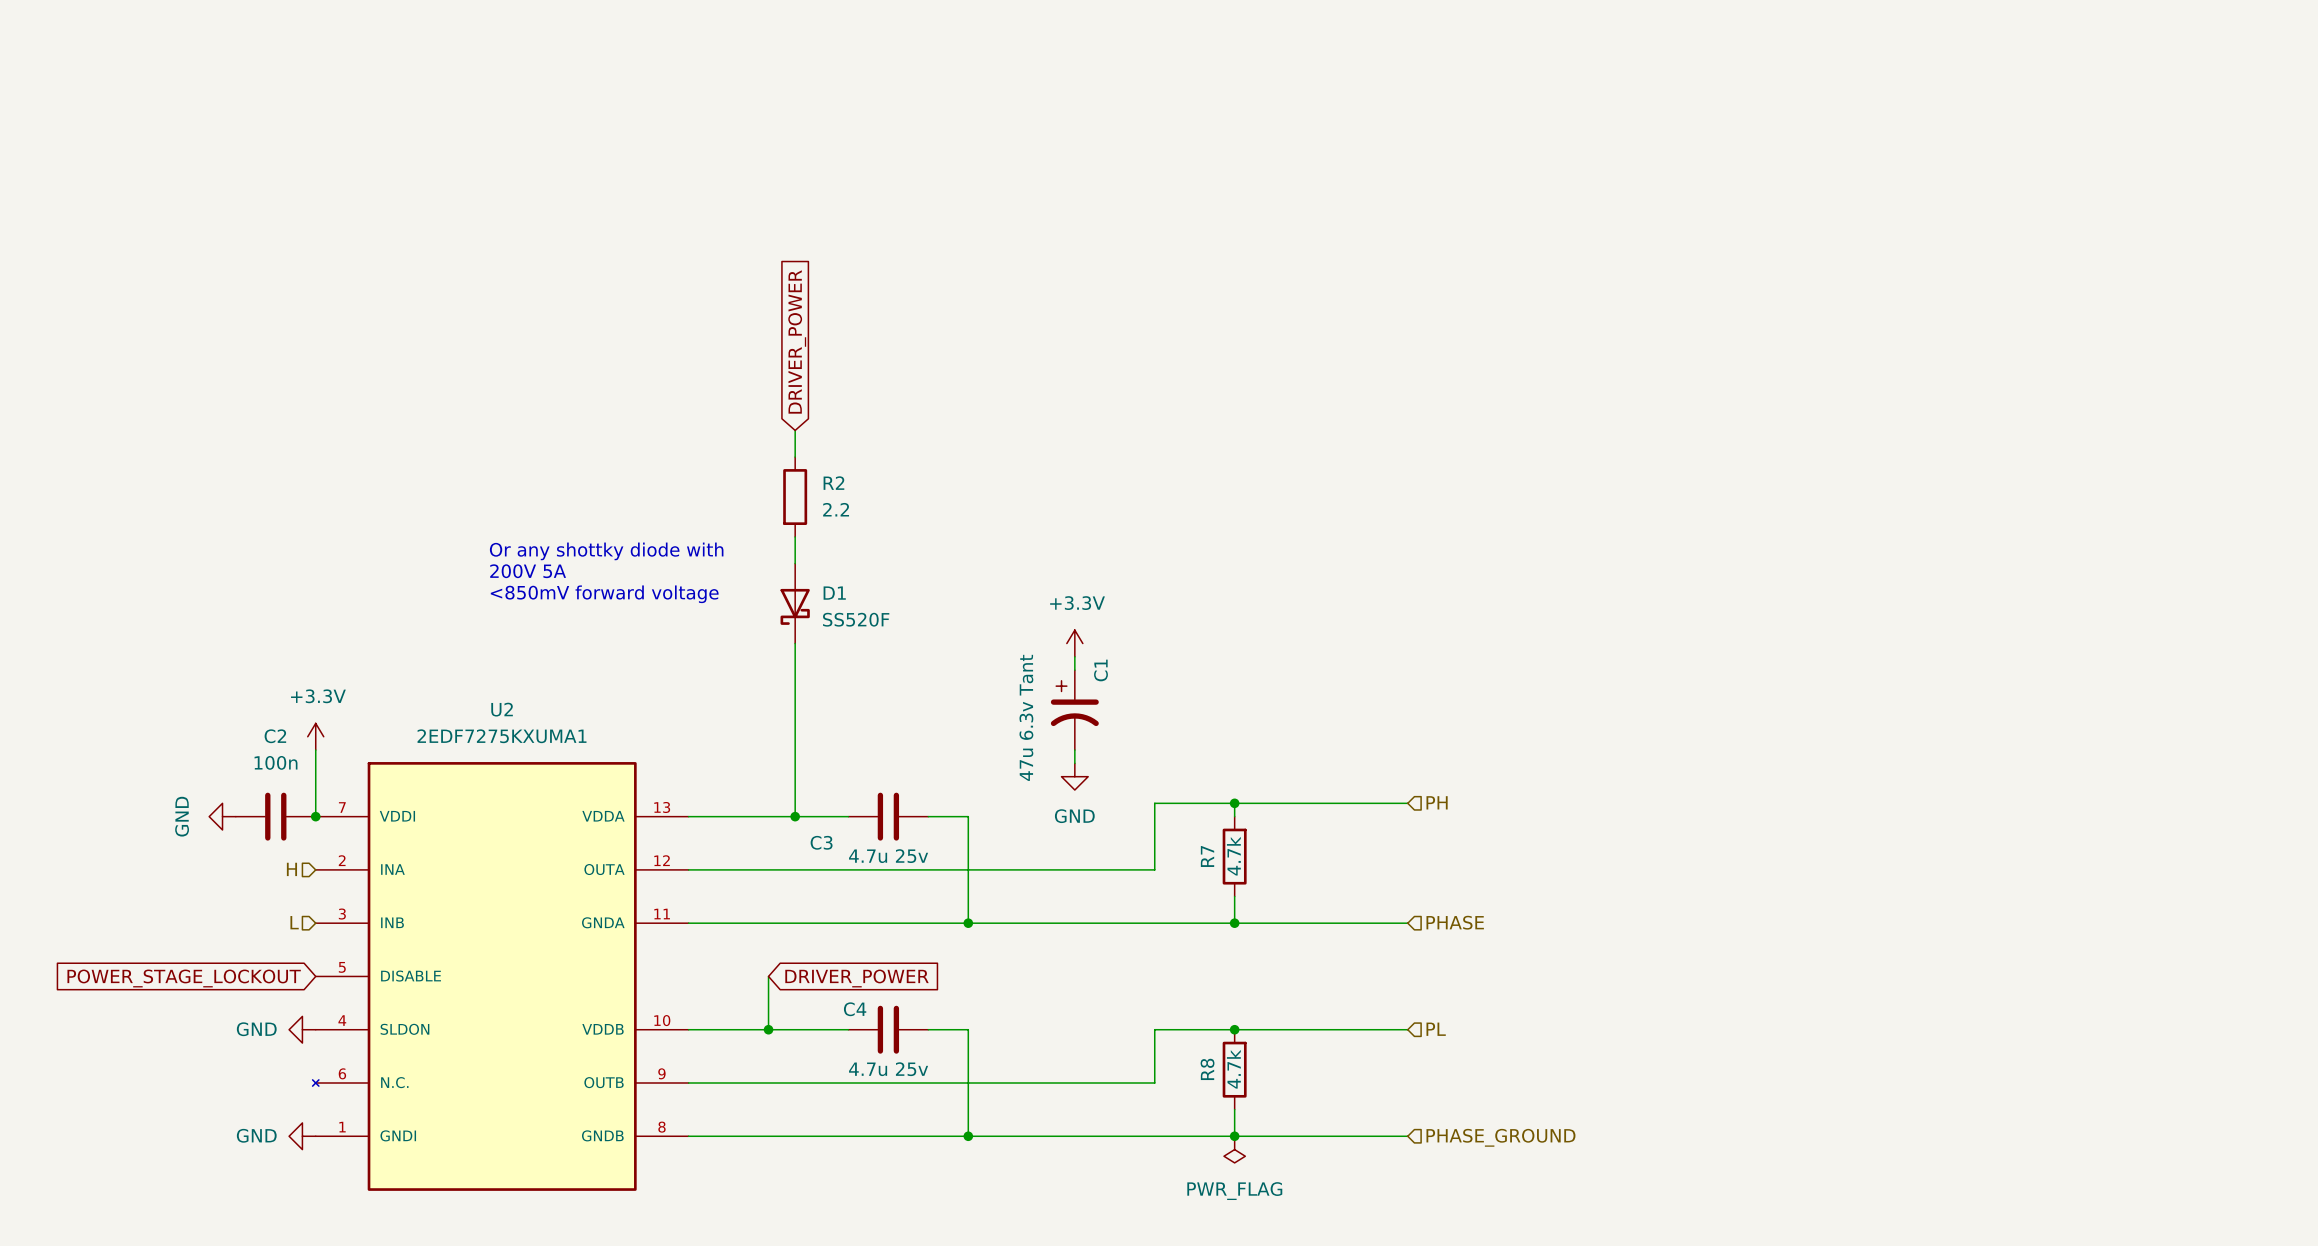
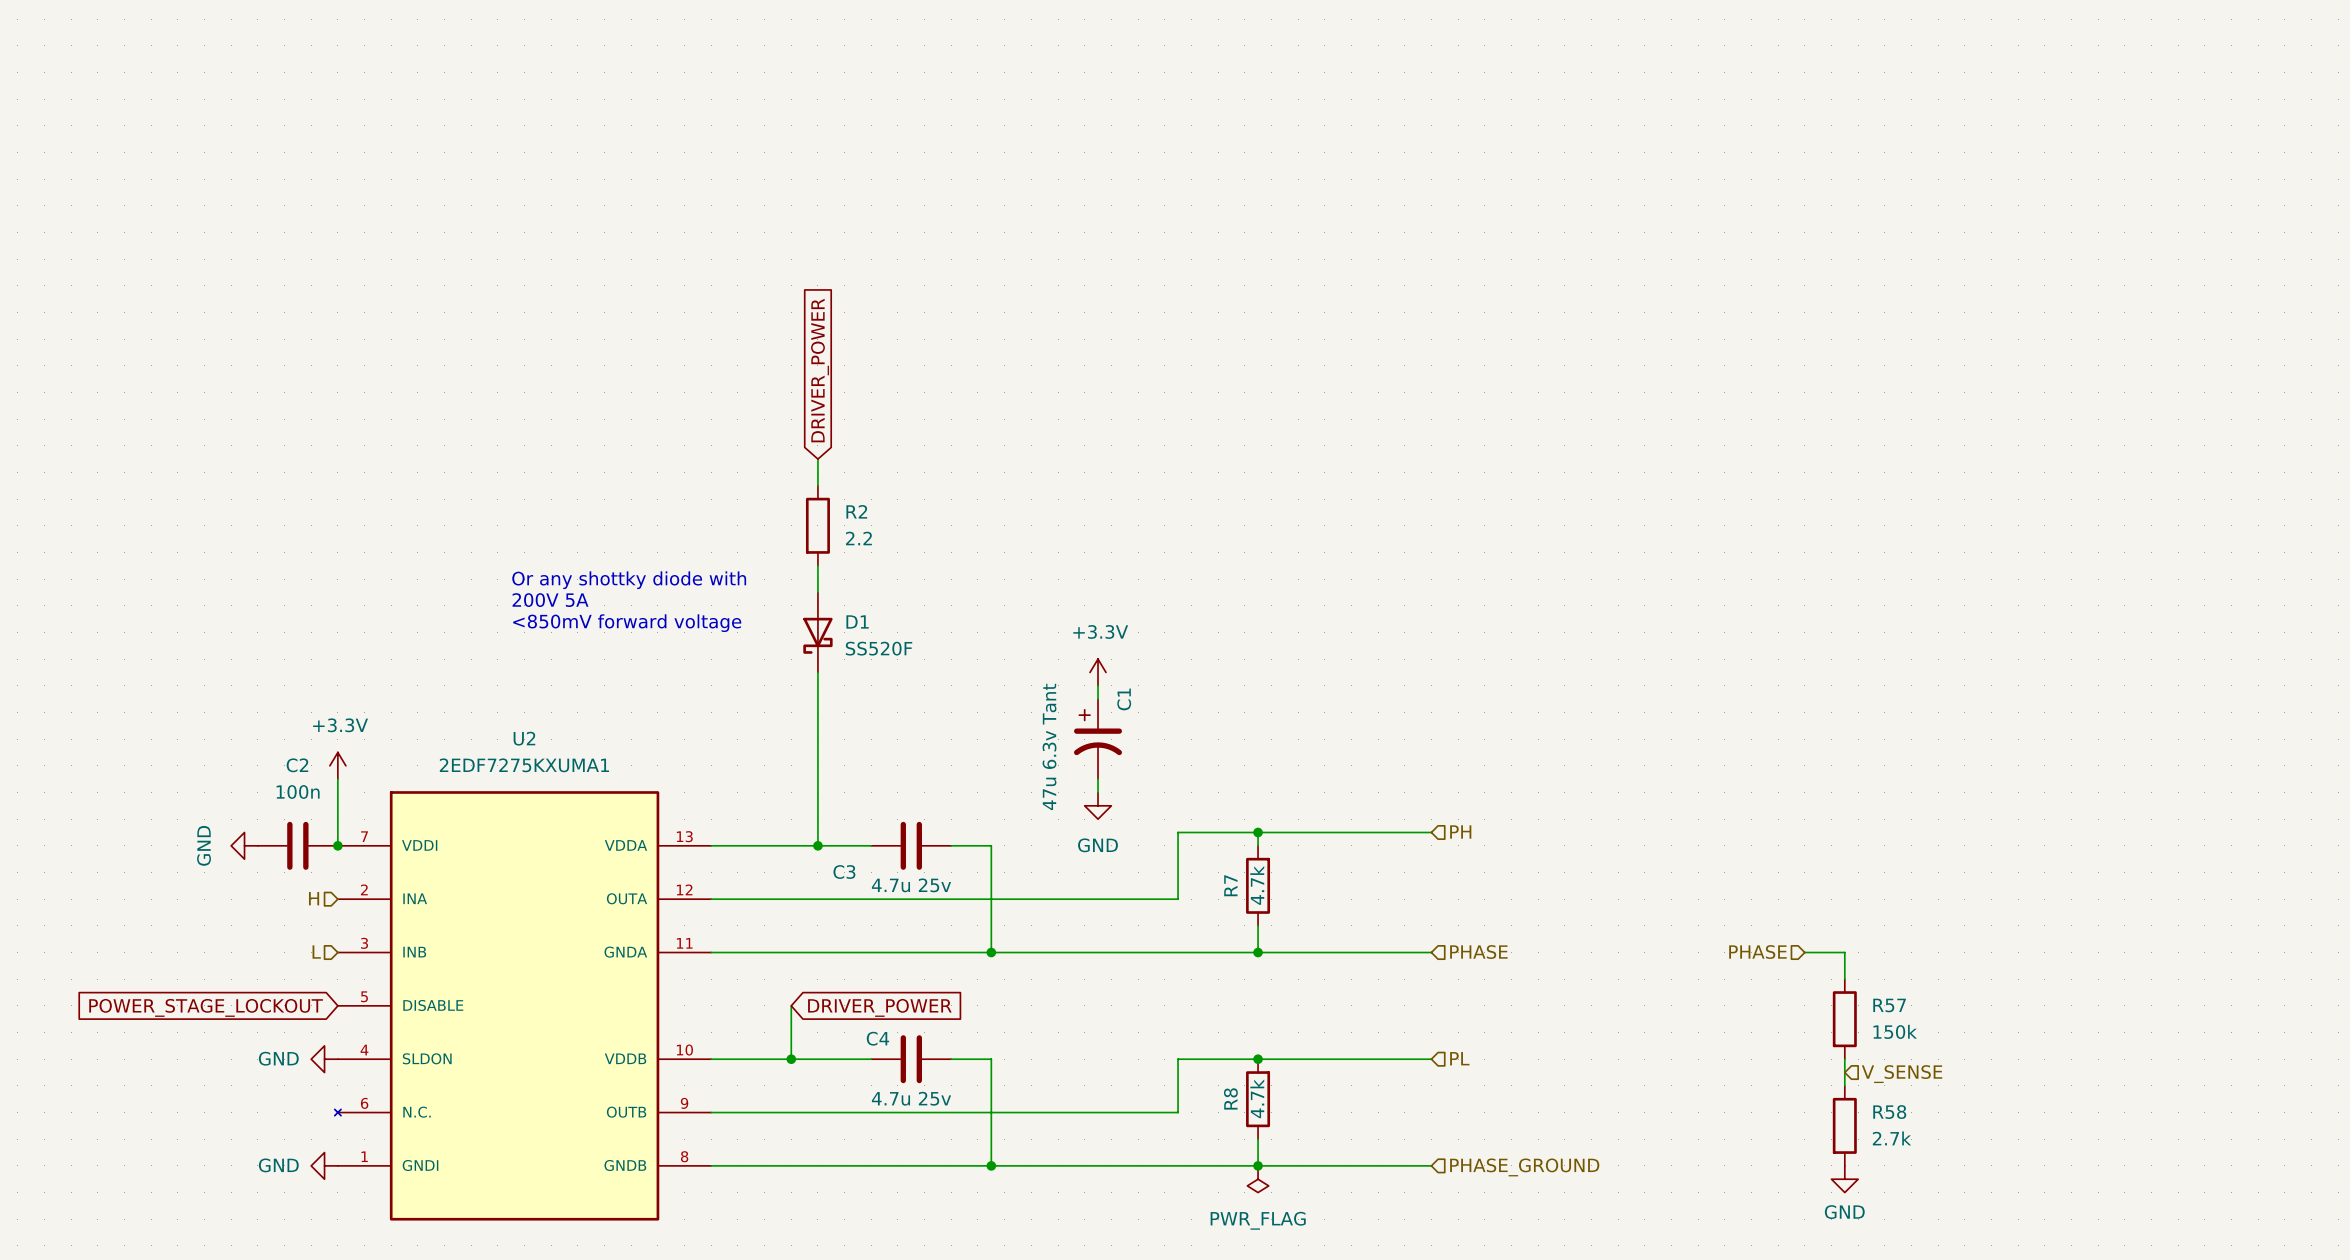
hierarchical label: none -> PHASE (1757, 952)
wire: none -> (1804, 952) (1844, 952) (1844, 979)
R57: none -> 150k (1844, 1019)
wire: none -> (1844, 1059) (1844, 1085)
hierarchical label: none -> V_SENSE (1902, 1074)
R58: none -> 2.7k (1844, 1125)
power symbol: none -> GND (1844, 1179)

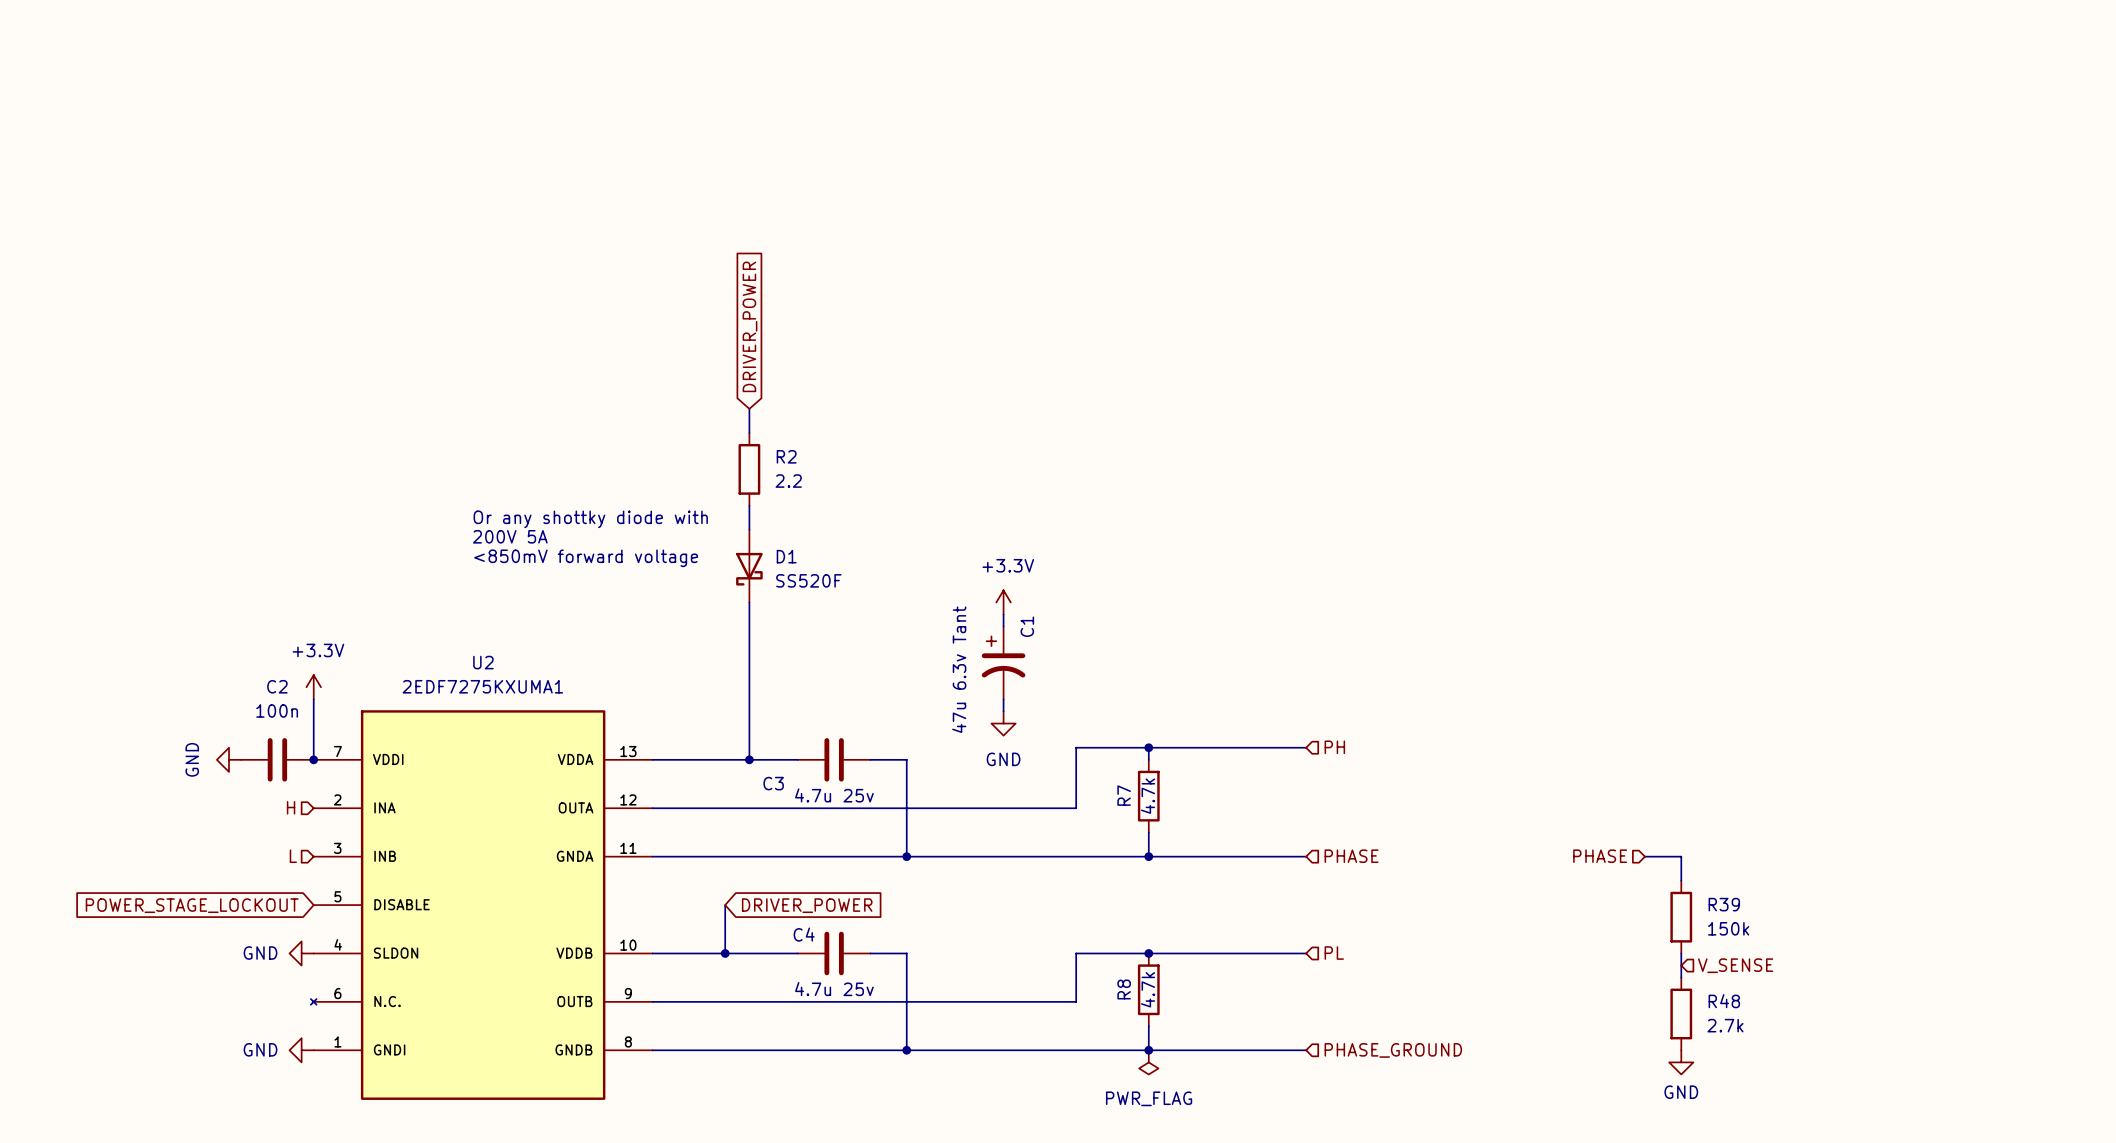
R57 name: R57 (1889, 1005) -> R39 (1724, 904)
R58 name: R58 (1889, 1112) -> R48 (1724, 1001)

